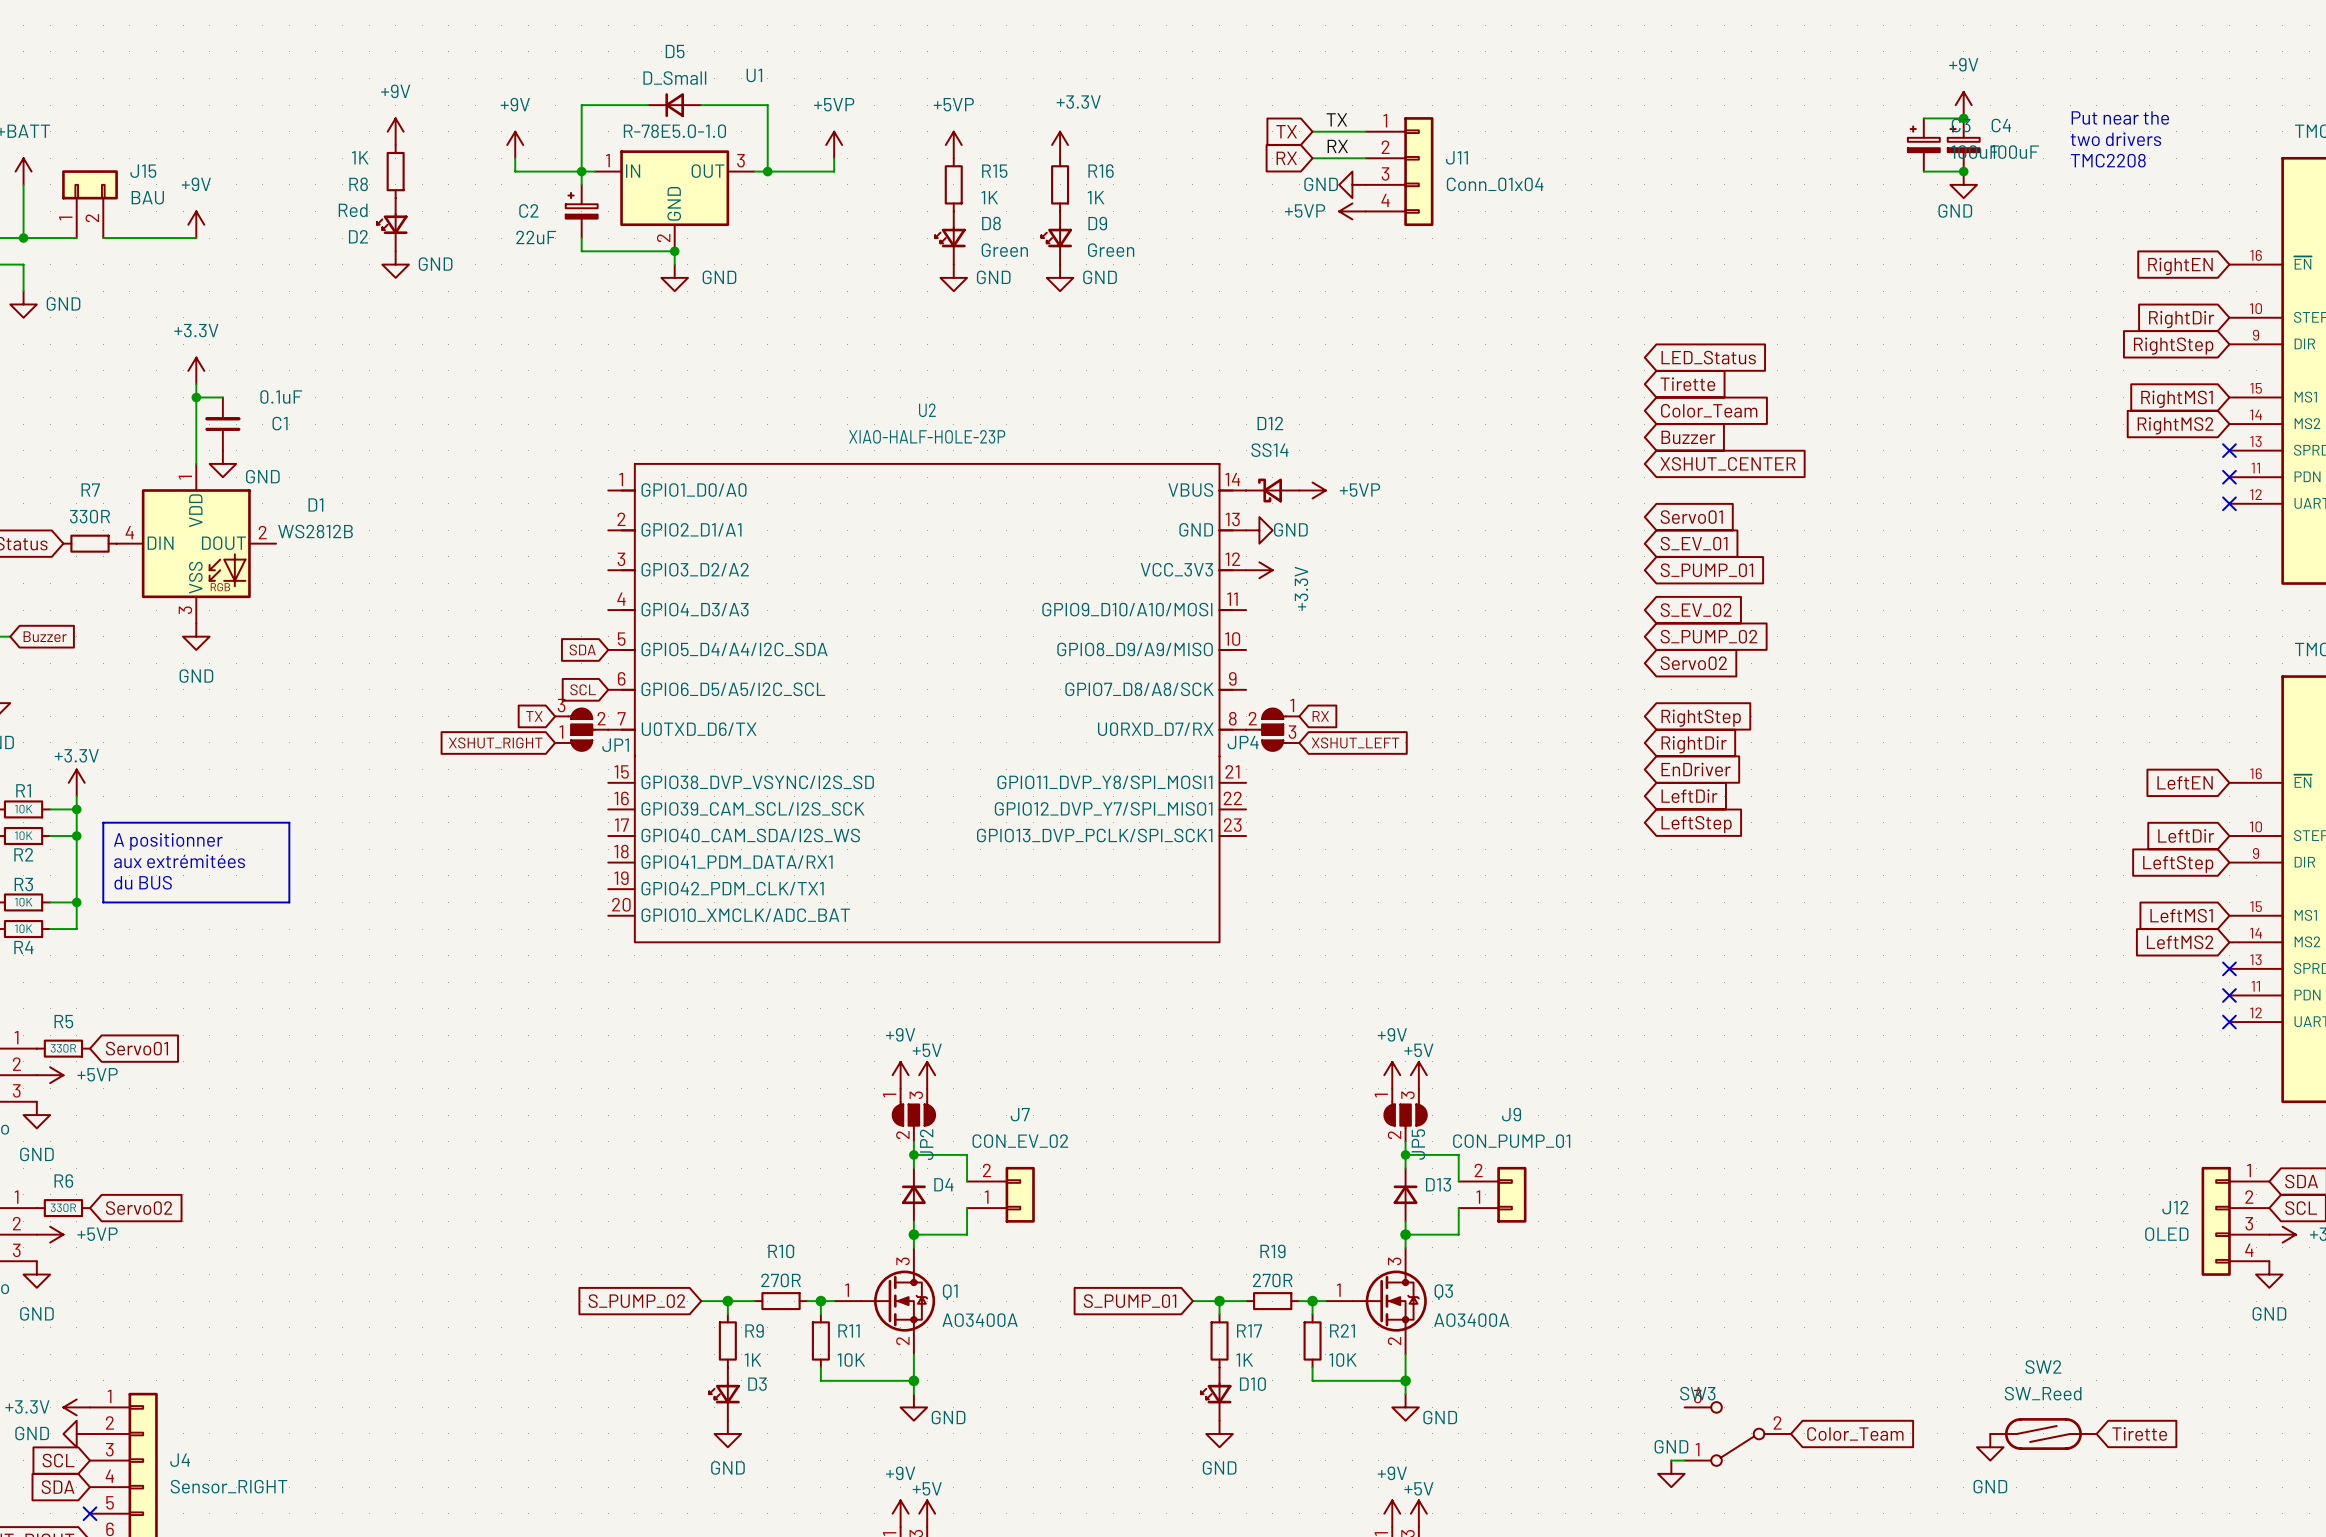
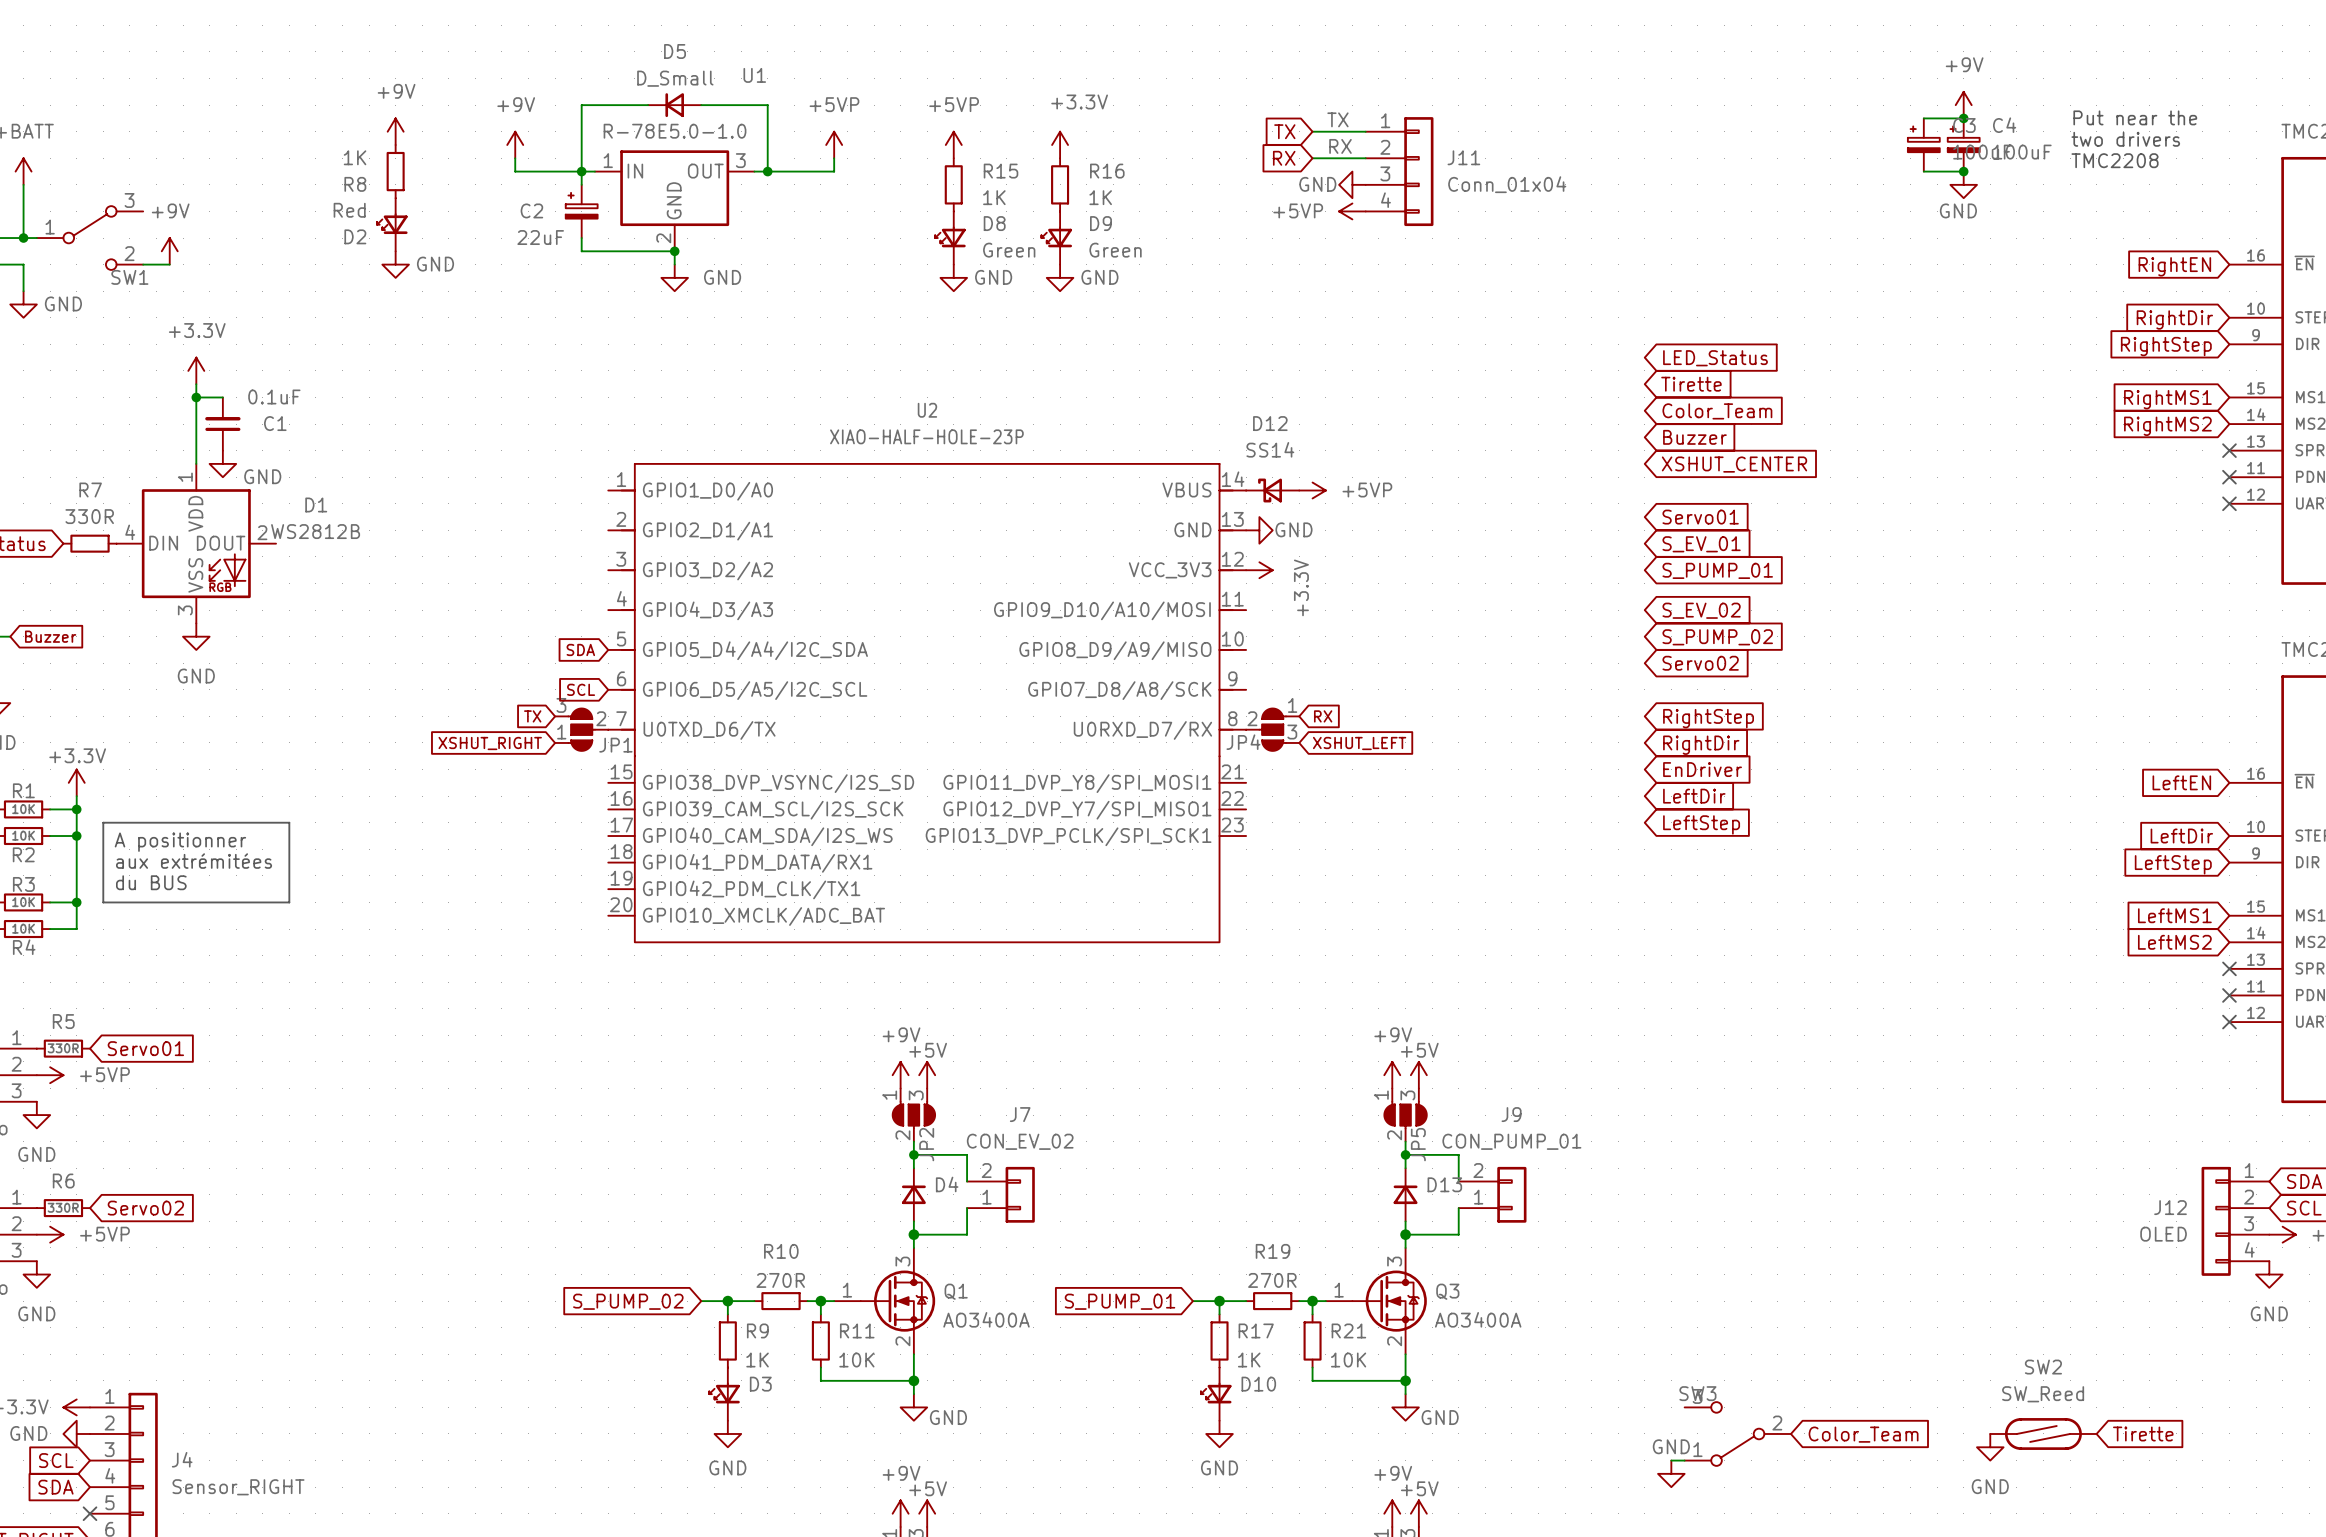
J15: BAU (90, 204) -> none
power symbol position: +9V (196, 224) -> +9V (169, 251)
SW1: none -> (90, 238)
wire: (103, 238) (196, 238) -> none
wire: none -> (143, 264) (169, 264)

